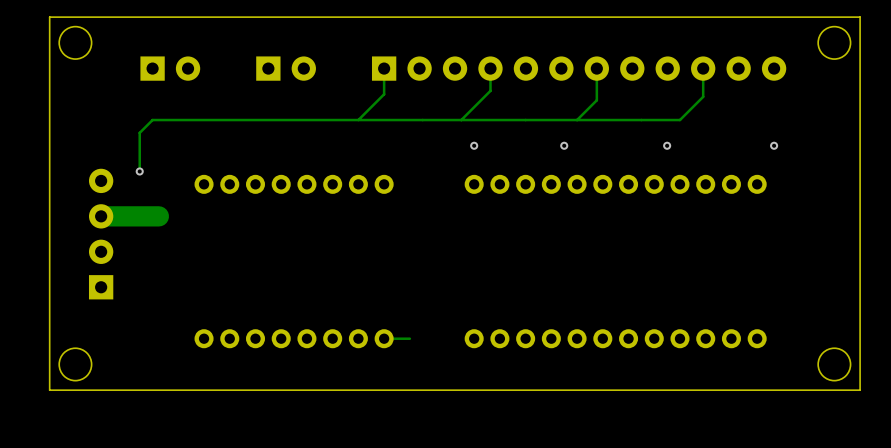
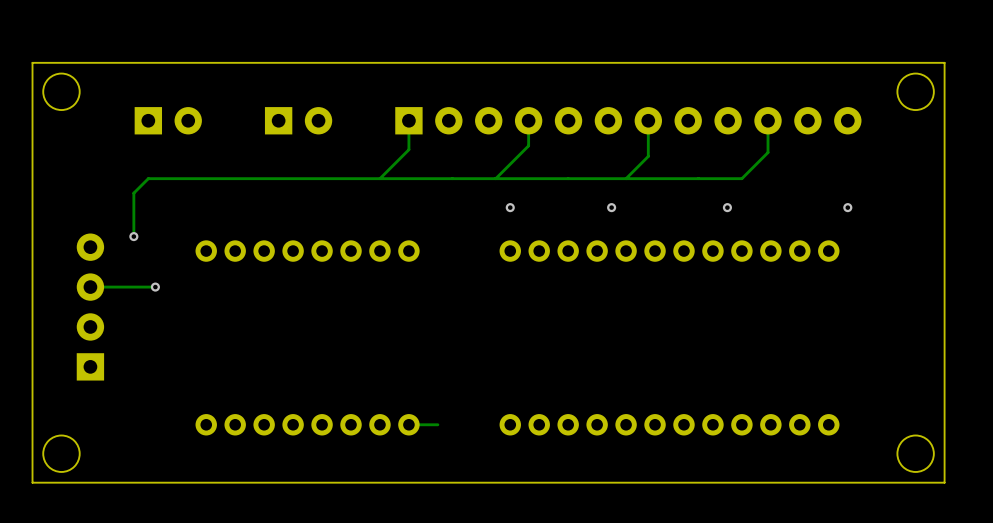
track width: thick (158, 216) (101, 216) -> thin (155, 287) (90, 287)
via: none -> (155, 287)

